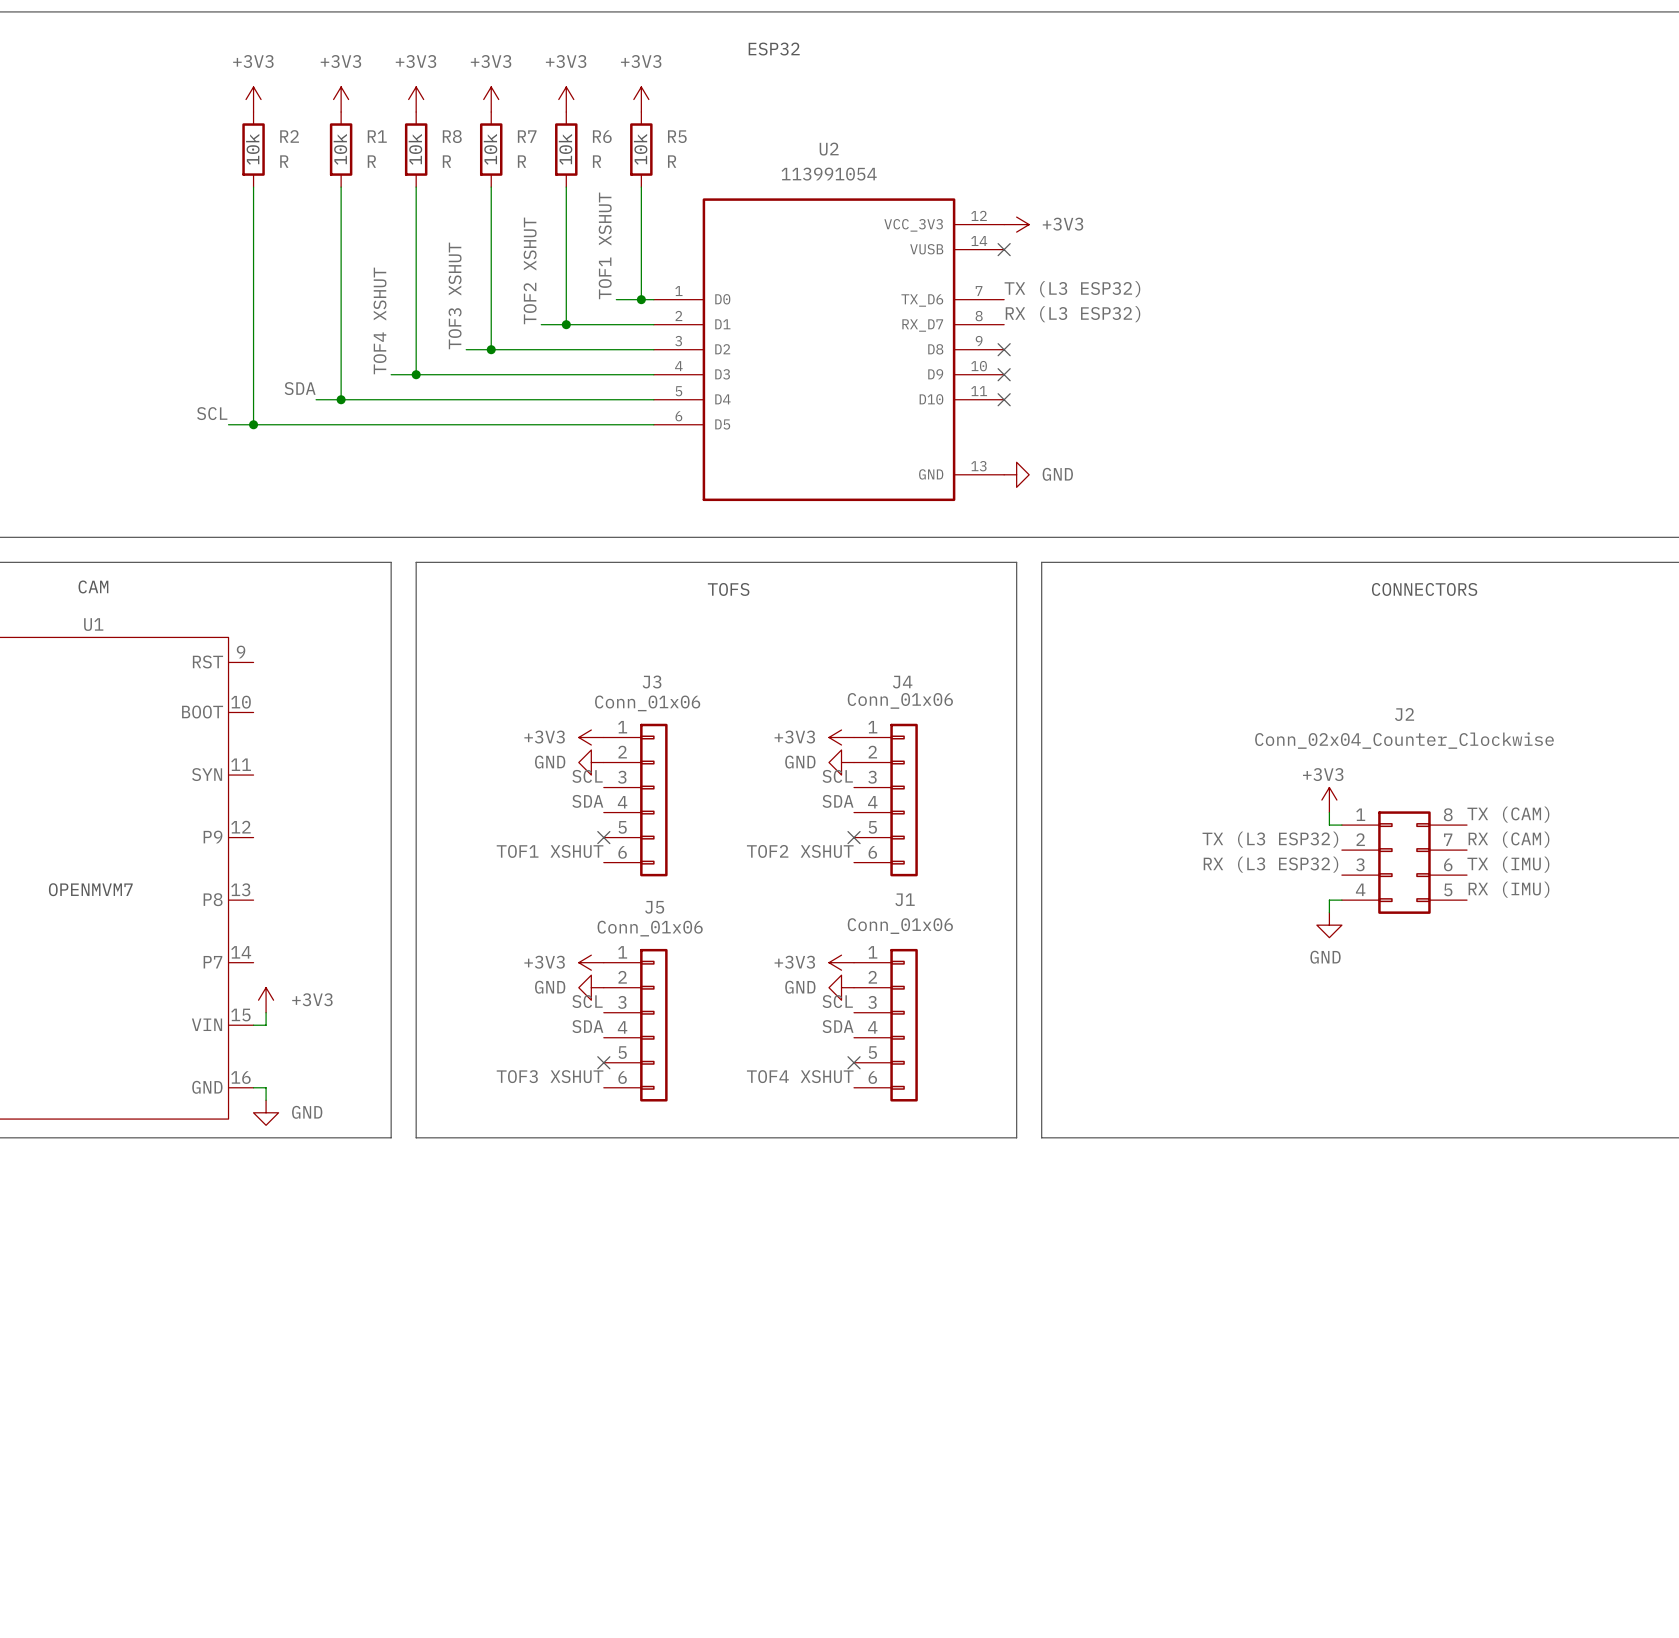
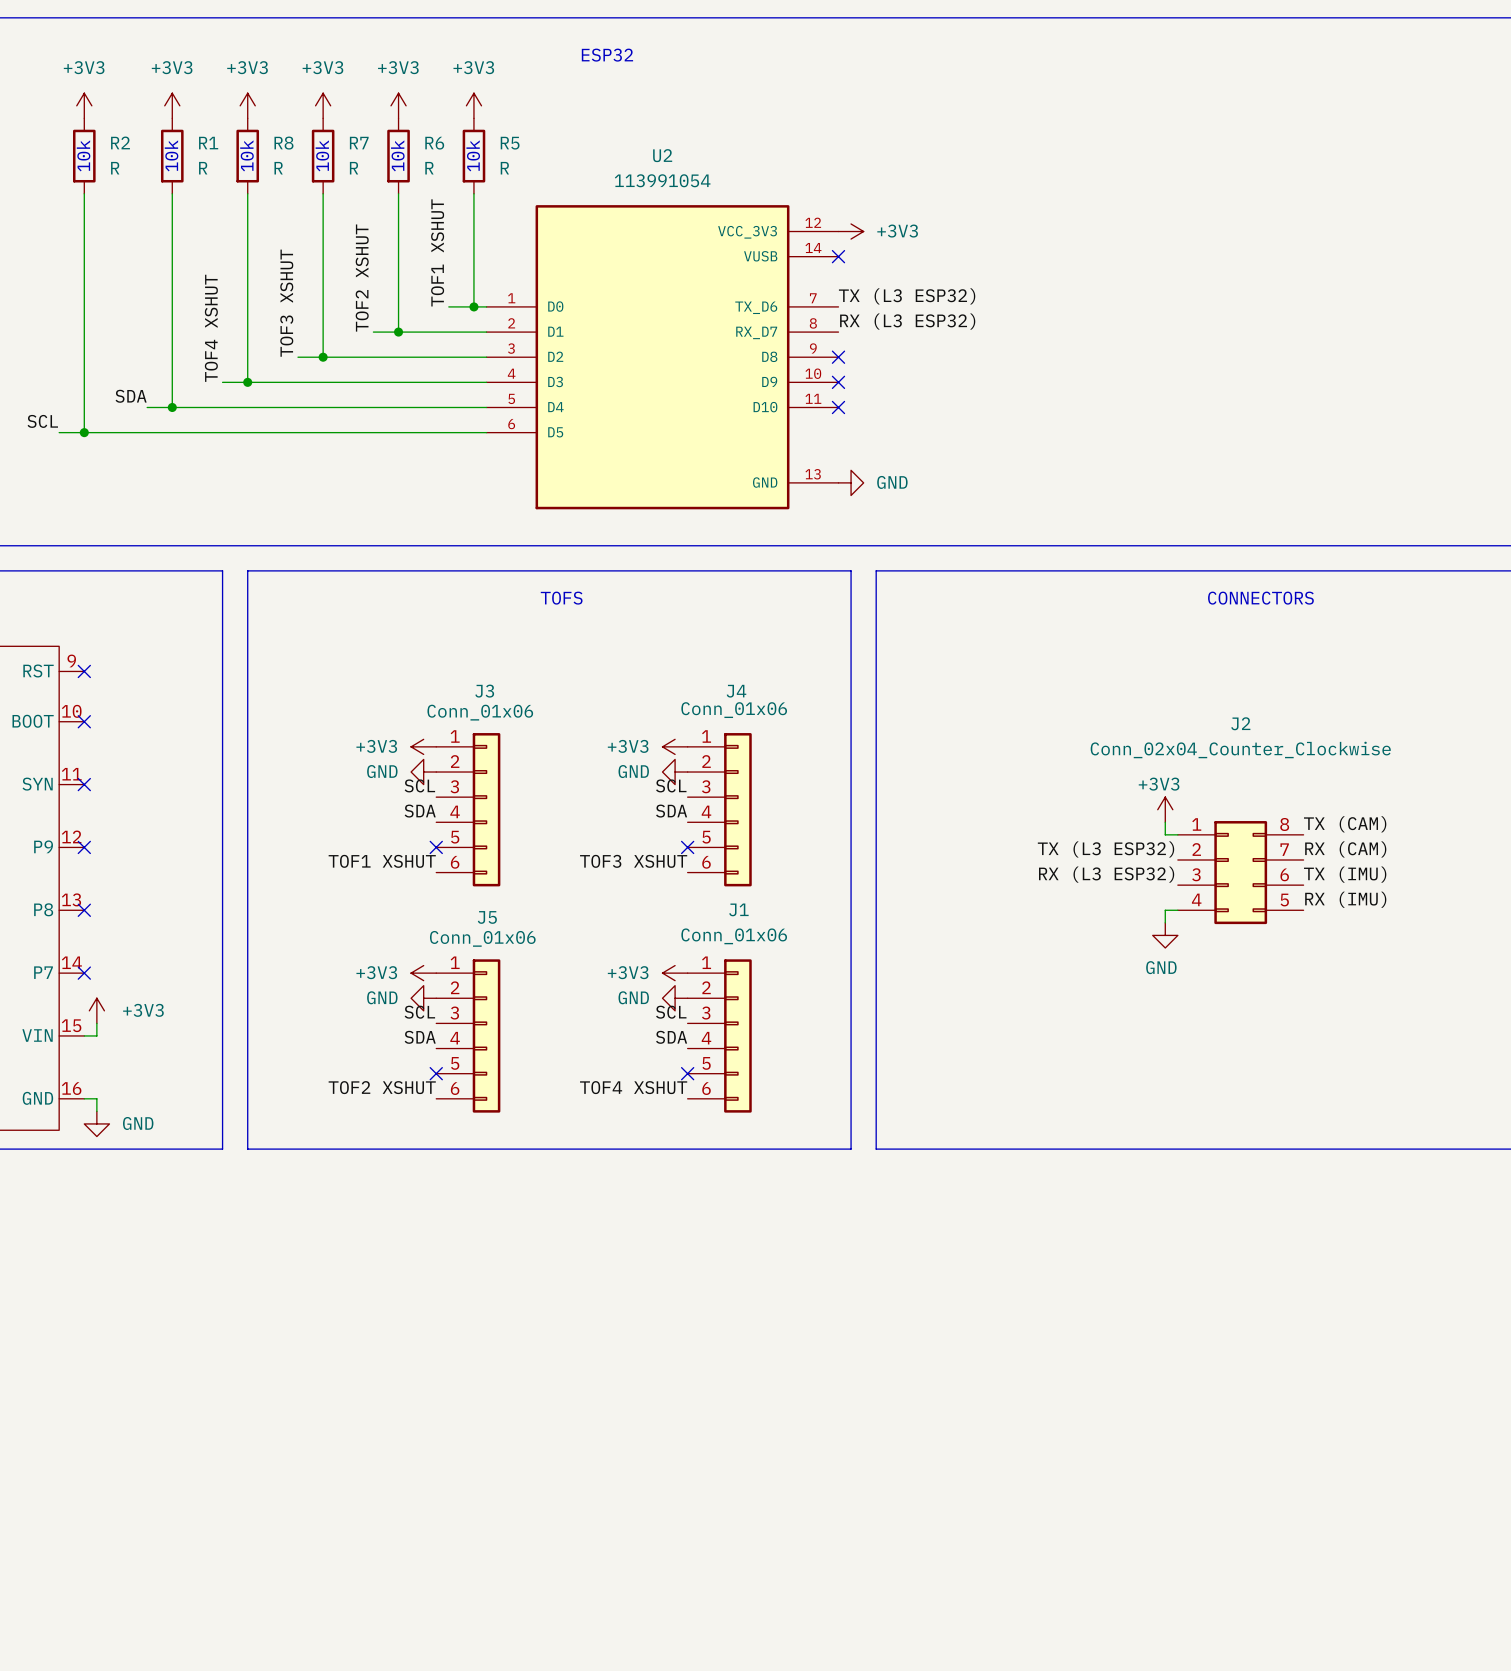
no-connect mark: none -> (84, 671)
no-connect mark: none -> (84, 721)
no-connect mark: none -> (84, 784)
no-connect mark: none -> (84, 847)
label: TOF2 XSHUT (800, 851) -> TOF3 XSHUT (633, 861)
no-connect mark: none -> (84, 910)
no-connect mark: none -> (84, 973)
label: TOF3 XSHUT (550, 1076) -> TOF2 XSHUT (382, 1087)

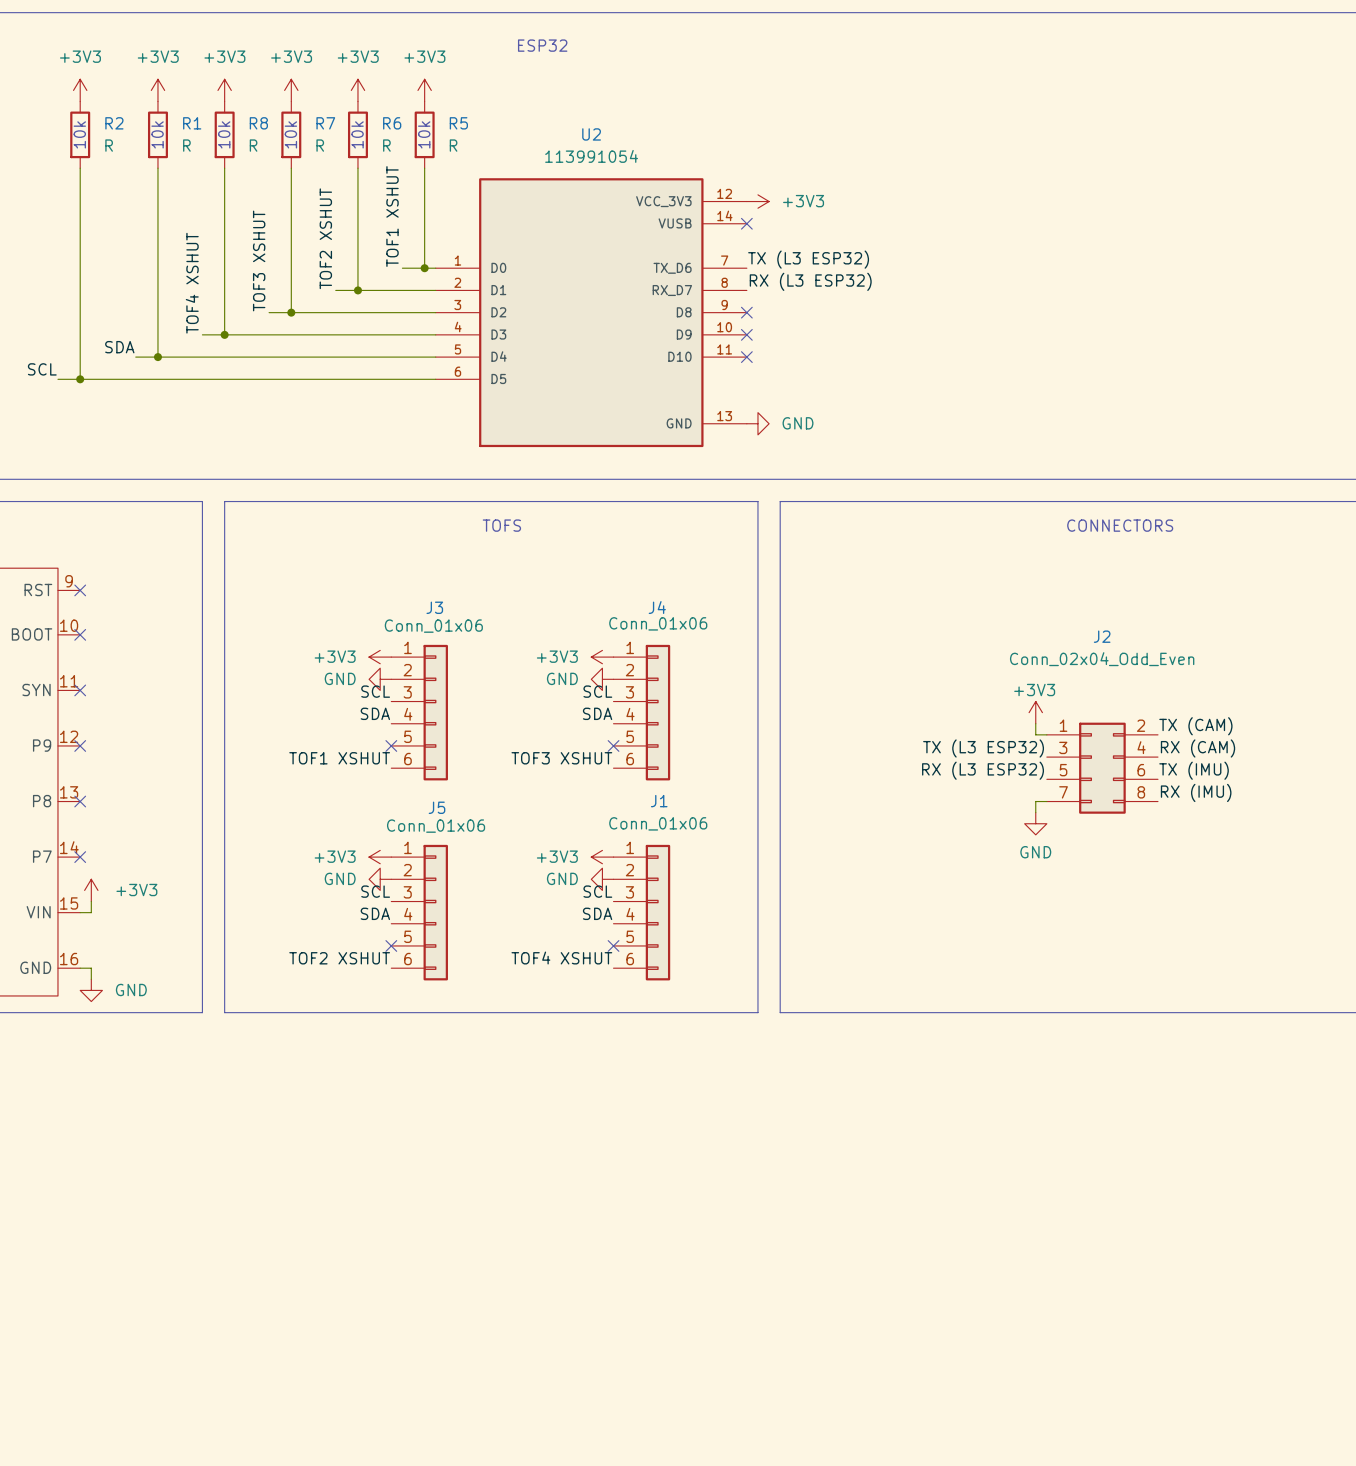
J2 value: Conn_02x04_Counter_Clockwise (1240, 749) -> Conn_02x04_Odd_Even (1102, 659)
J2 pin number: 8 (1284, 824) -> 2 (1141, 725)
J2 pin number: 2 (1196, 849) -> 3 (1063, 747)
J2 pin number: 7 (1284, 849) -> 4 (1141, 747)
J2 pin number: 3 (1196, 874) -> 5 (1063, 770)
J2 pin number: 4 (1196, 899) -> 7 (1063, 792)
J2 pin number: 5 (1284, 900) -> 8 (1141, 792)

